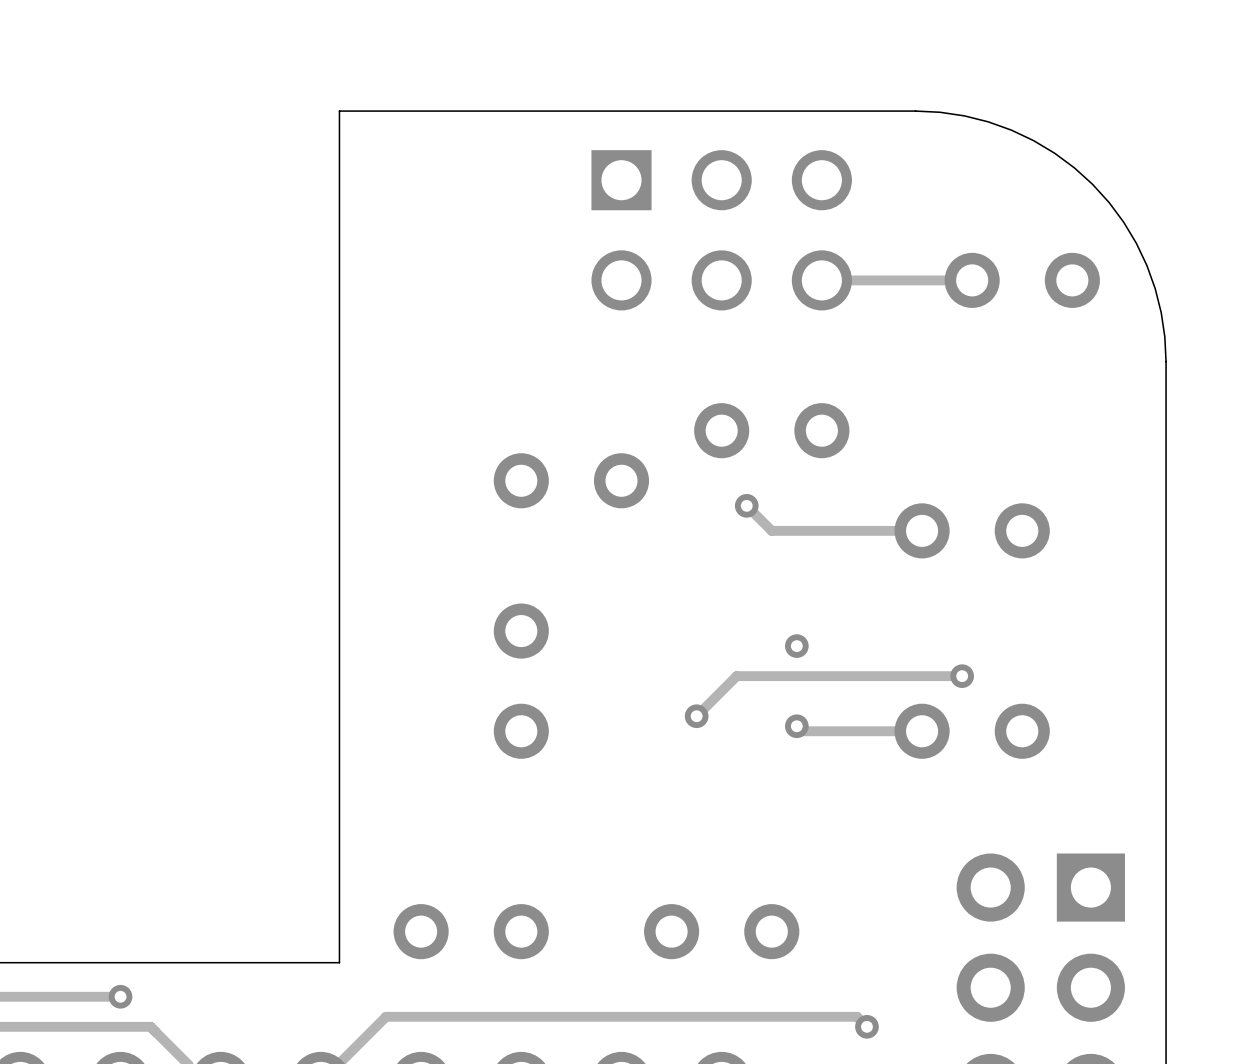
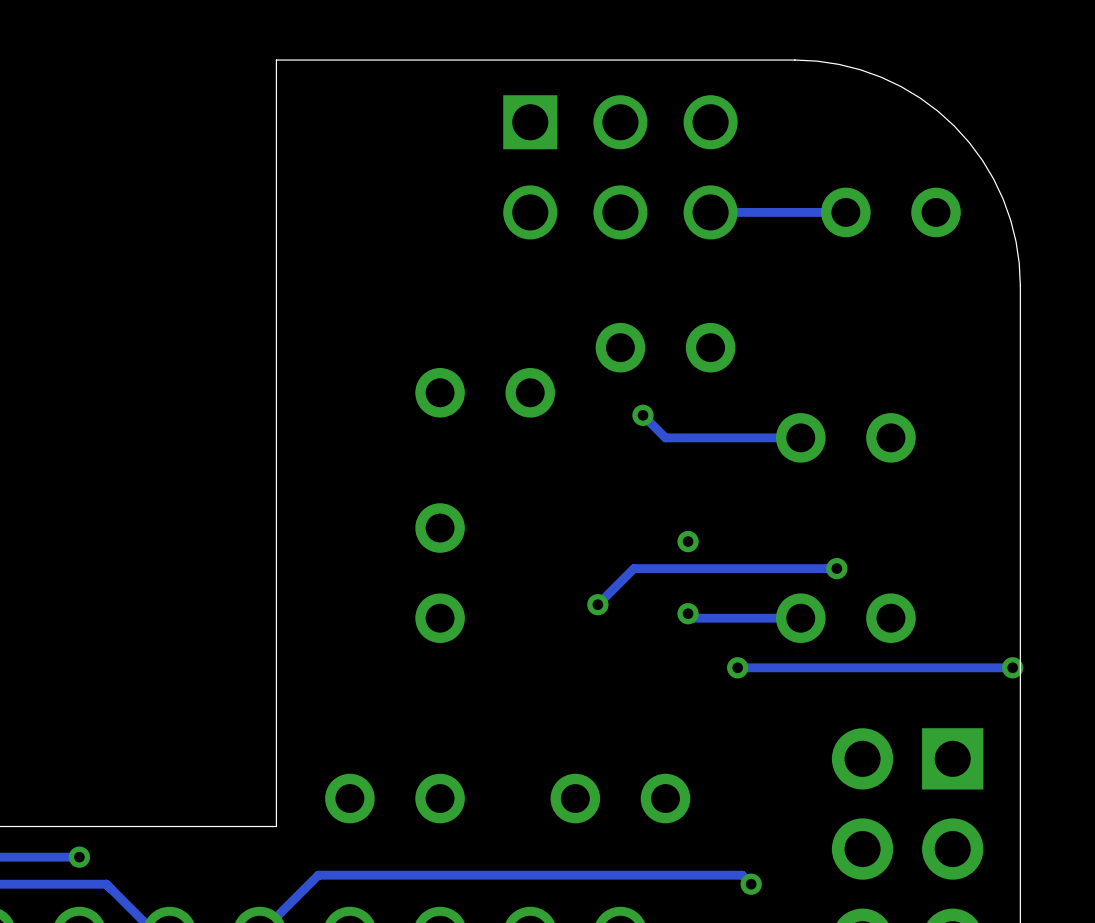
via: none -> (737, 667)
track: none -> (1012, 667) (737, 667)
via: none -> (1012, 667)

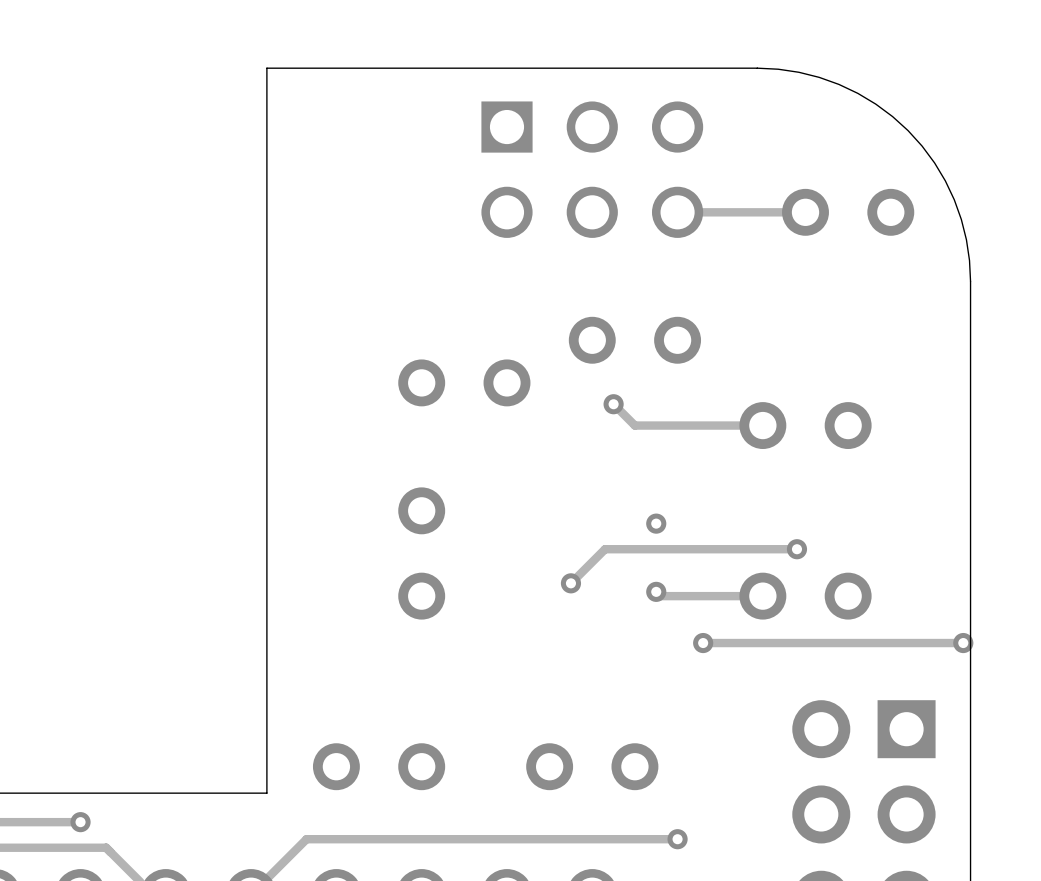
track: (710, 875) (742, 875) (751, 884) -> none
via position: (751, 884) -> (677, 839)

